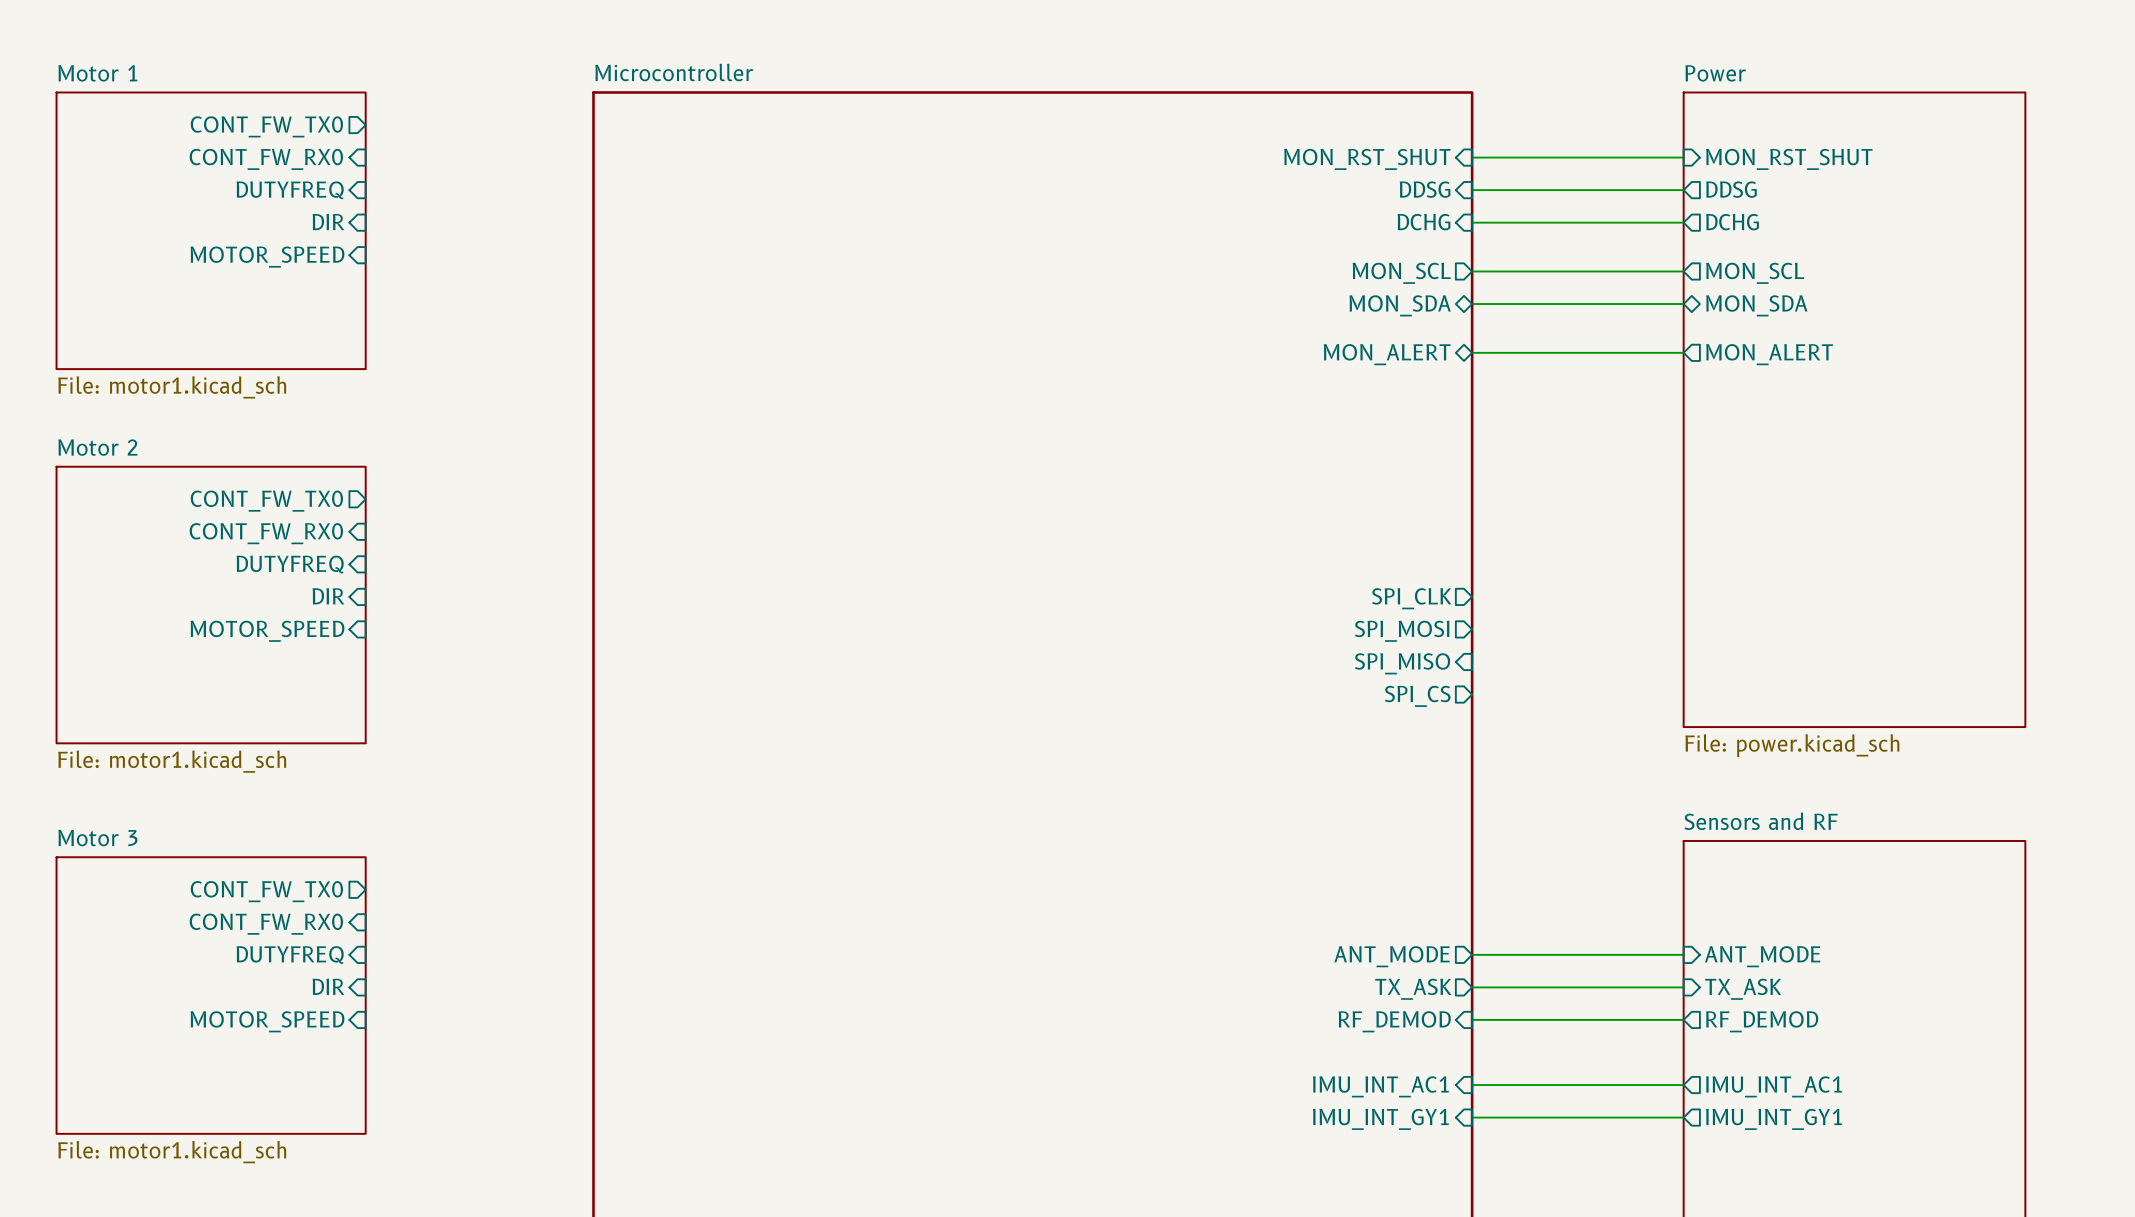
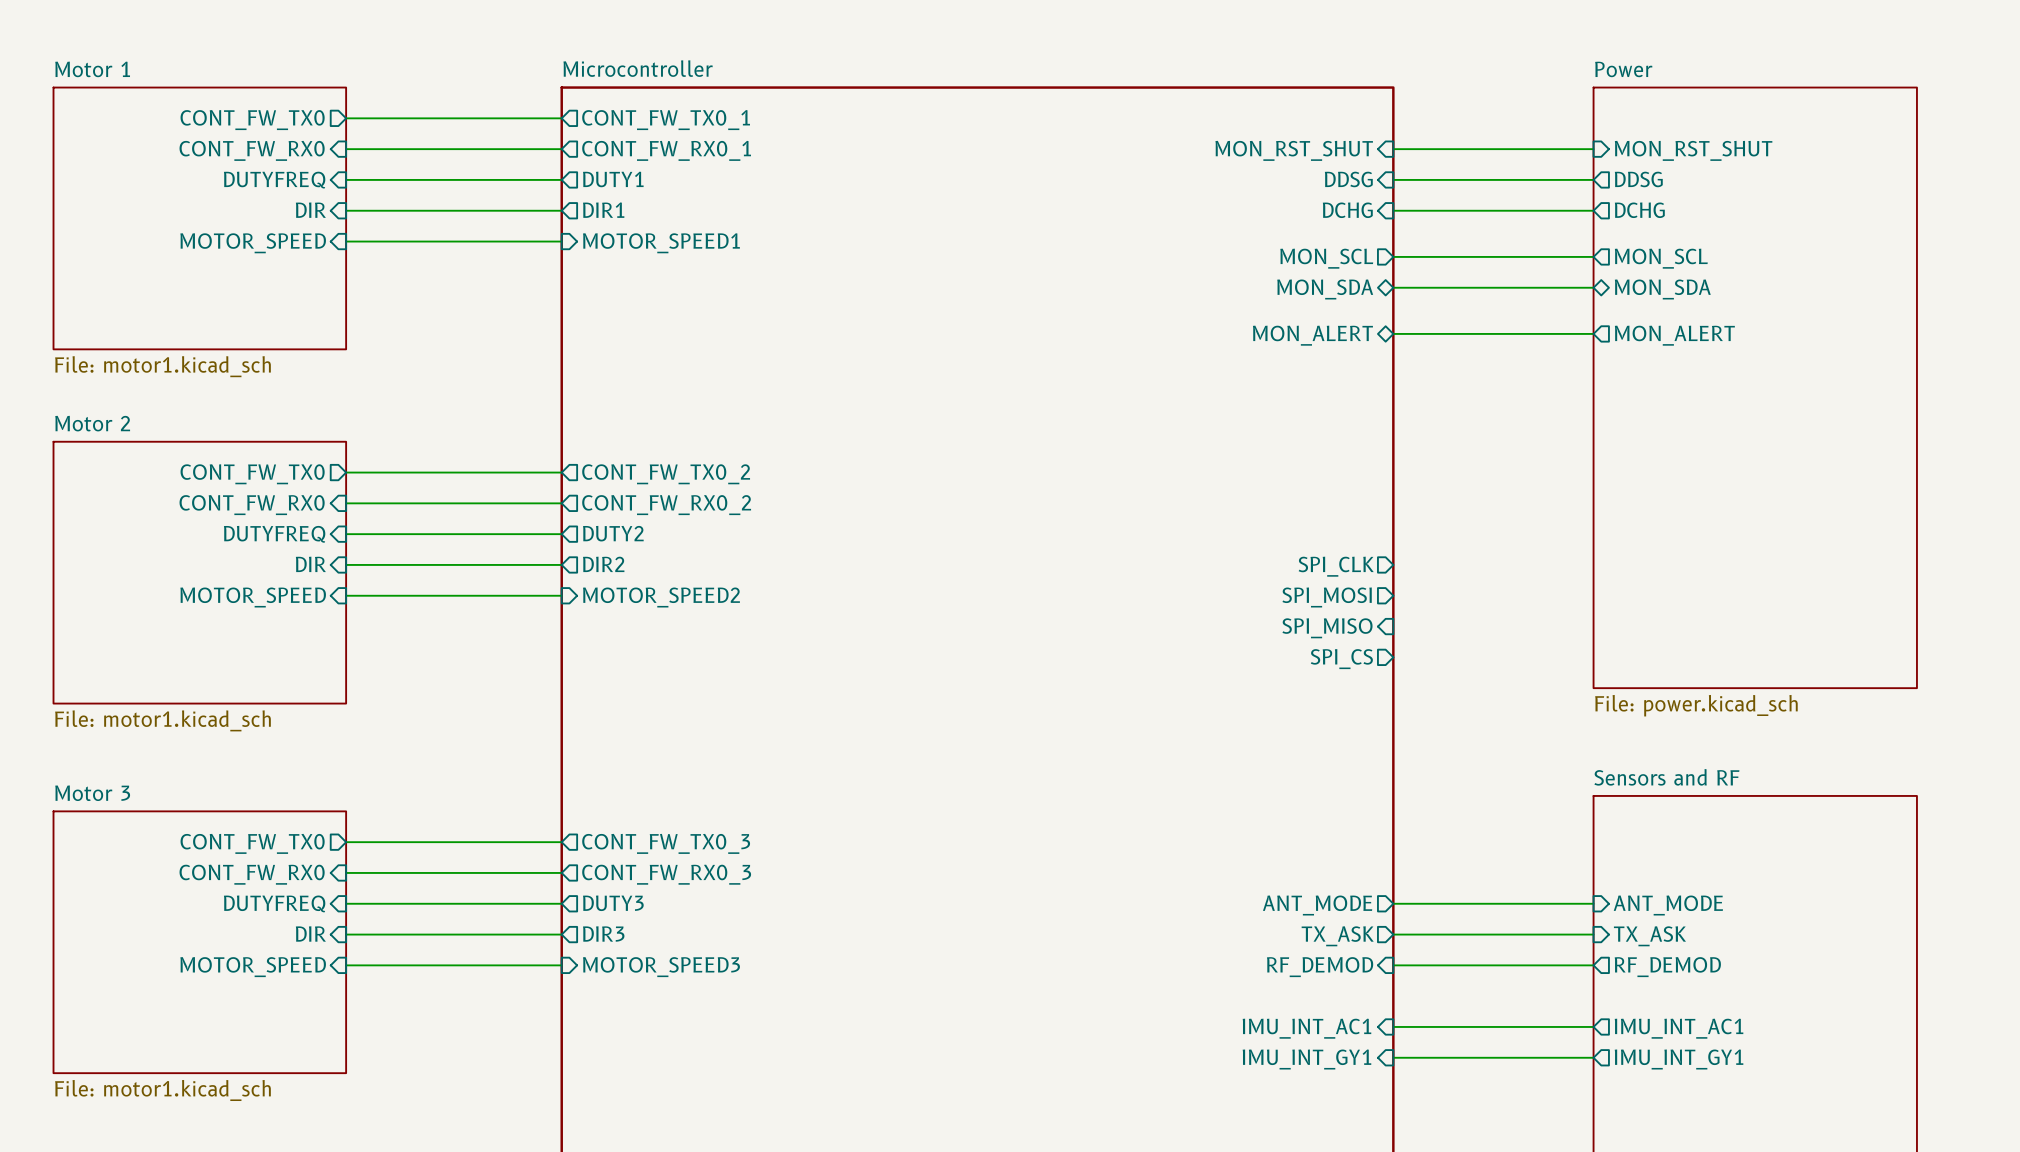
wire: none -> (346, 118) (561, 118)
sheet pin: none -> CONT_FW_TX0_1 (666, 120)
wire: none -> (346, 149) (561, 149)
sheet pin: none -> CONT_FW_RX0_1 (666, 150)
sheet pin: none -> DUTY1 (613, 179)
wire: none -> (346, 179) (561, 179)
wire: none -> (346, 210) (561, 210)
sheet pin: none -> DIR1 (603, 210)
wire: none -> (346, 241) (561, 241)
sheet pin: none -> MOTOR_SPEED1 (661, 243)
wire: none -> (346, 472) (561, 472)
sheet pin: none -> CONT_FW_TX0_2 (666, 474)
wire: none -> (346, 503) (561, 503)
sheet pin: none -> CONT_FW_RX0_2 (666, 505)
sheet pin: none -> DUTY2 (613, 533)
wire: none -> (346, 534) (561, 534)
wire: none -> (346, 564) (561, 564)
sheet pin: none -> DIR2 (603, 564)
wire: none -> (346, 595) (561, 595)
sheet pin: none -> MOTOR_SPEED2 (661, 597)
wire: none -> (346, 842) (561, 842)
sheet pin: none -> CONT_FW_TX0_3 (666, 843)
wire: none -> (346, 872) (561, 872)
sheet pin: none -> CONT_FW_RX0_3 (666, 874)
wire: none -> (346, 903) (561, 903)
sheet pin: none -> DUTY3 (613, 903)
sheet pin: none -> DIR3 (603, 933)
wire: none -> (346, 934) (561, 934)
wire: none -> (346, 965) (561, 965)
sheet pin: none -> MOTOR_SPEED3 (661, 967)

